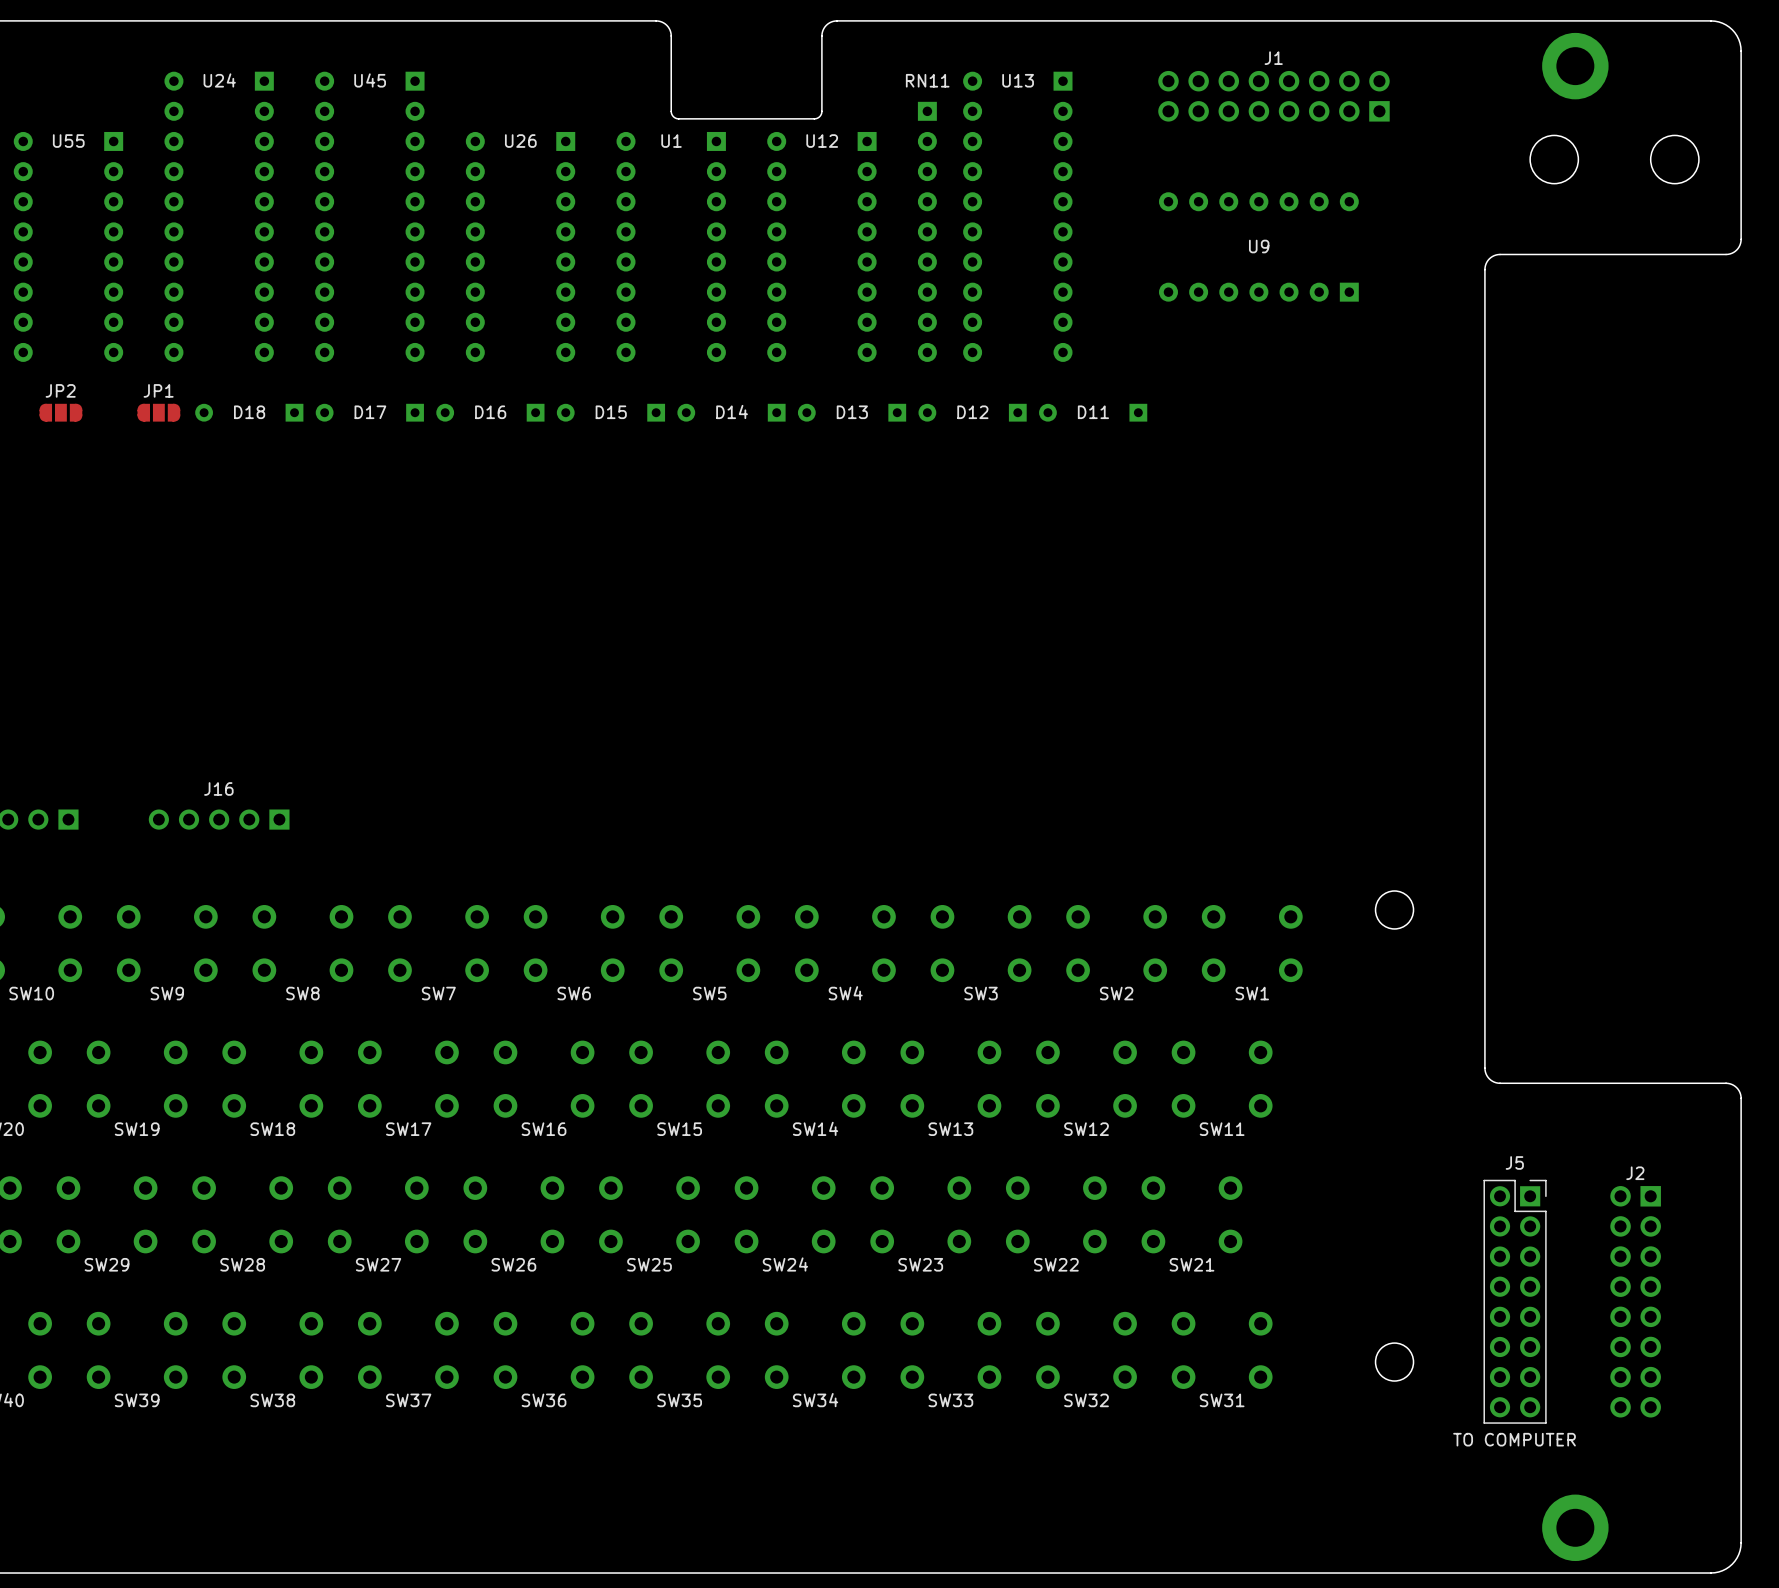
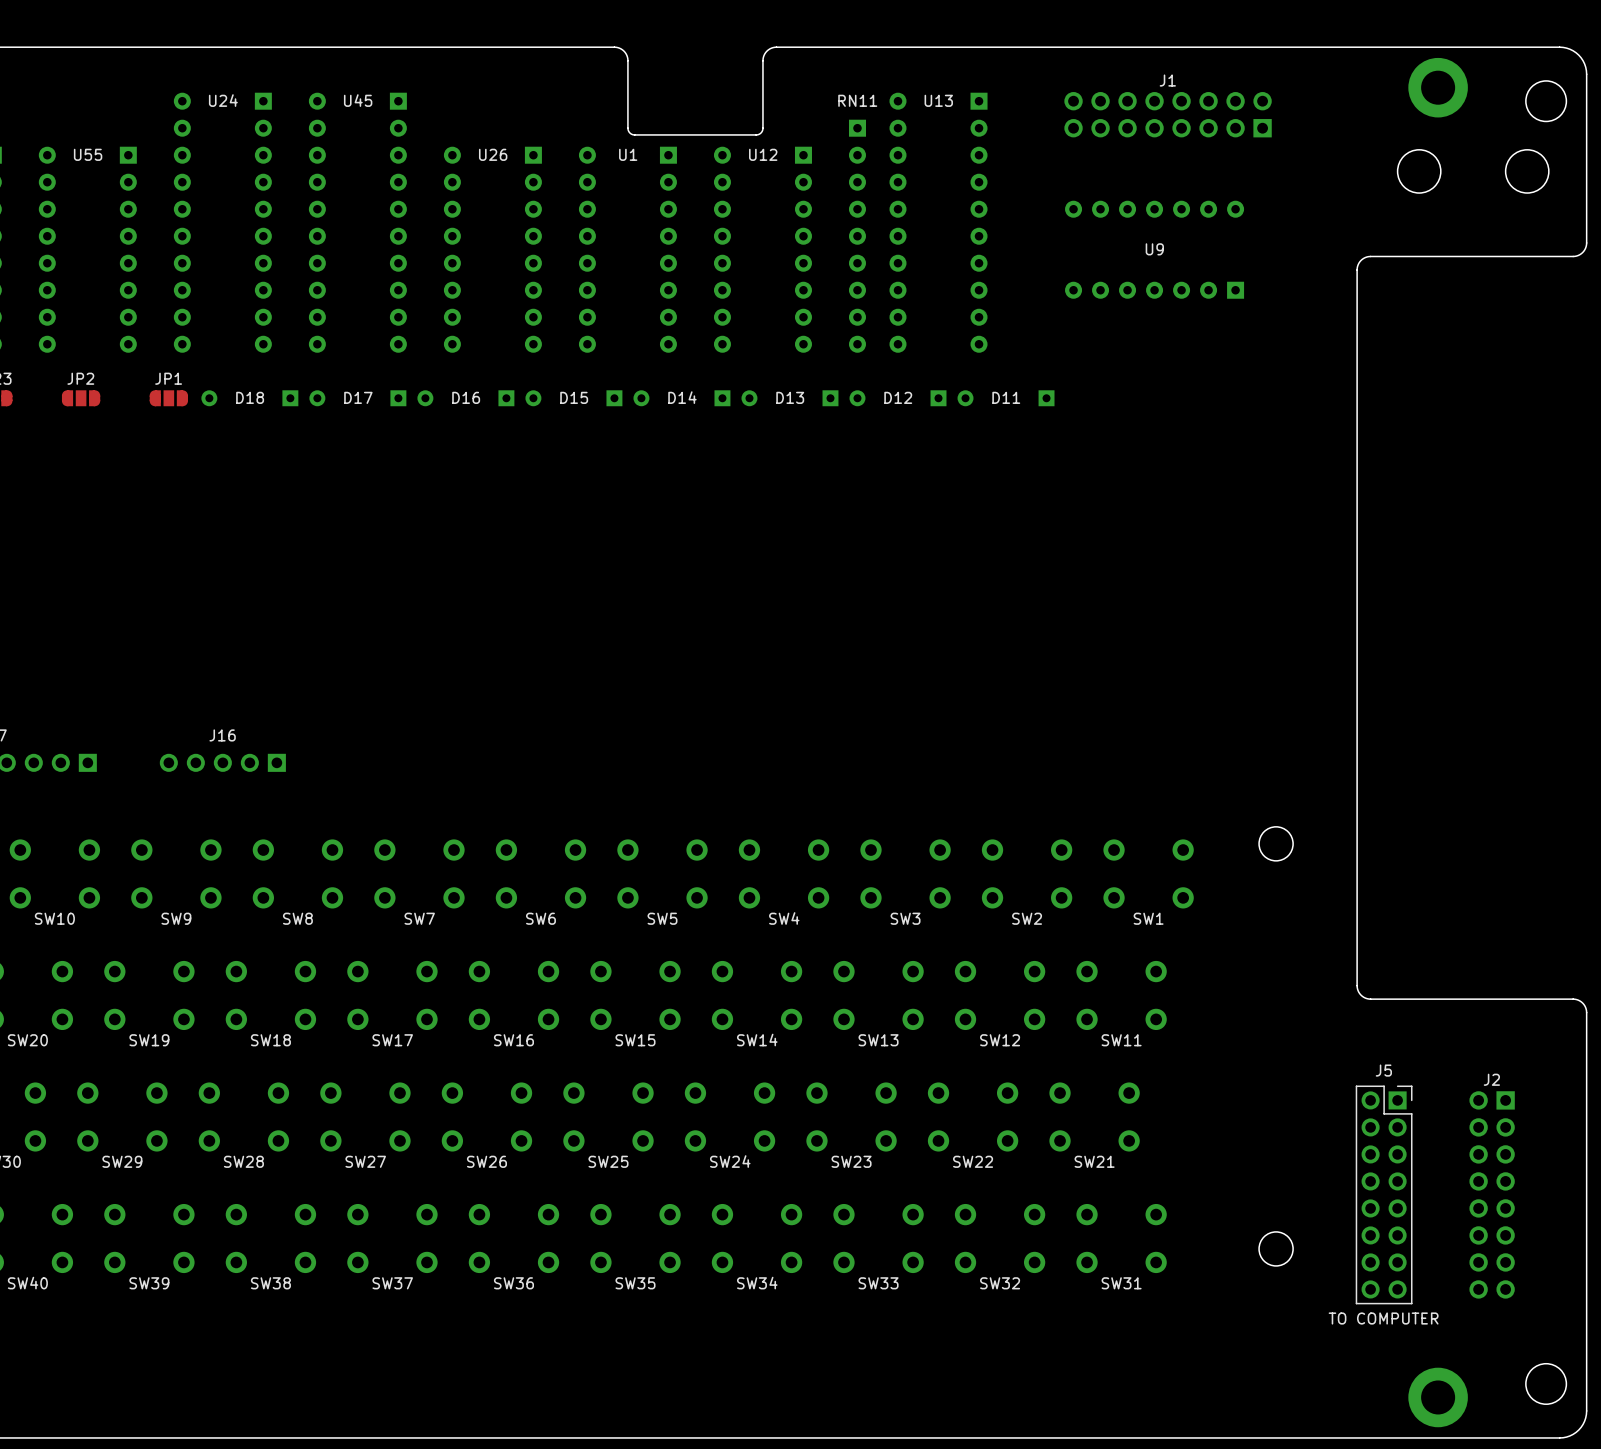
round board edge: none -> [1525, 80, 1568, 123]
round board edge: none -> [1525, 1363, 1568, 1405]

